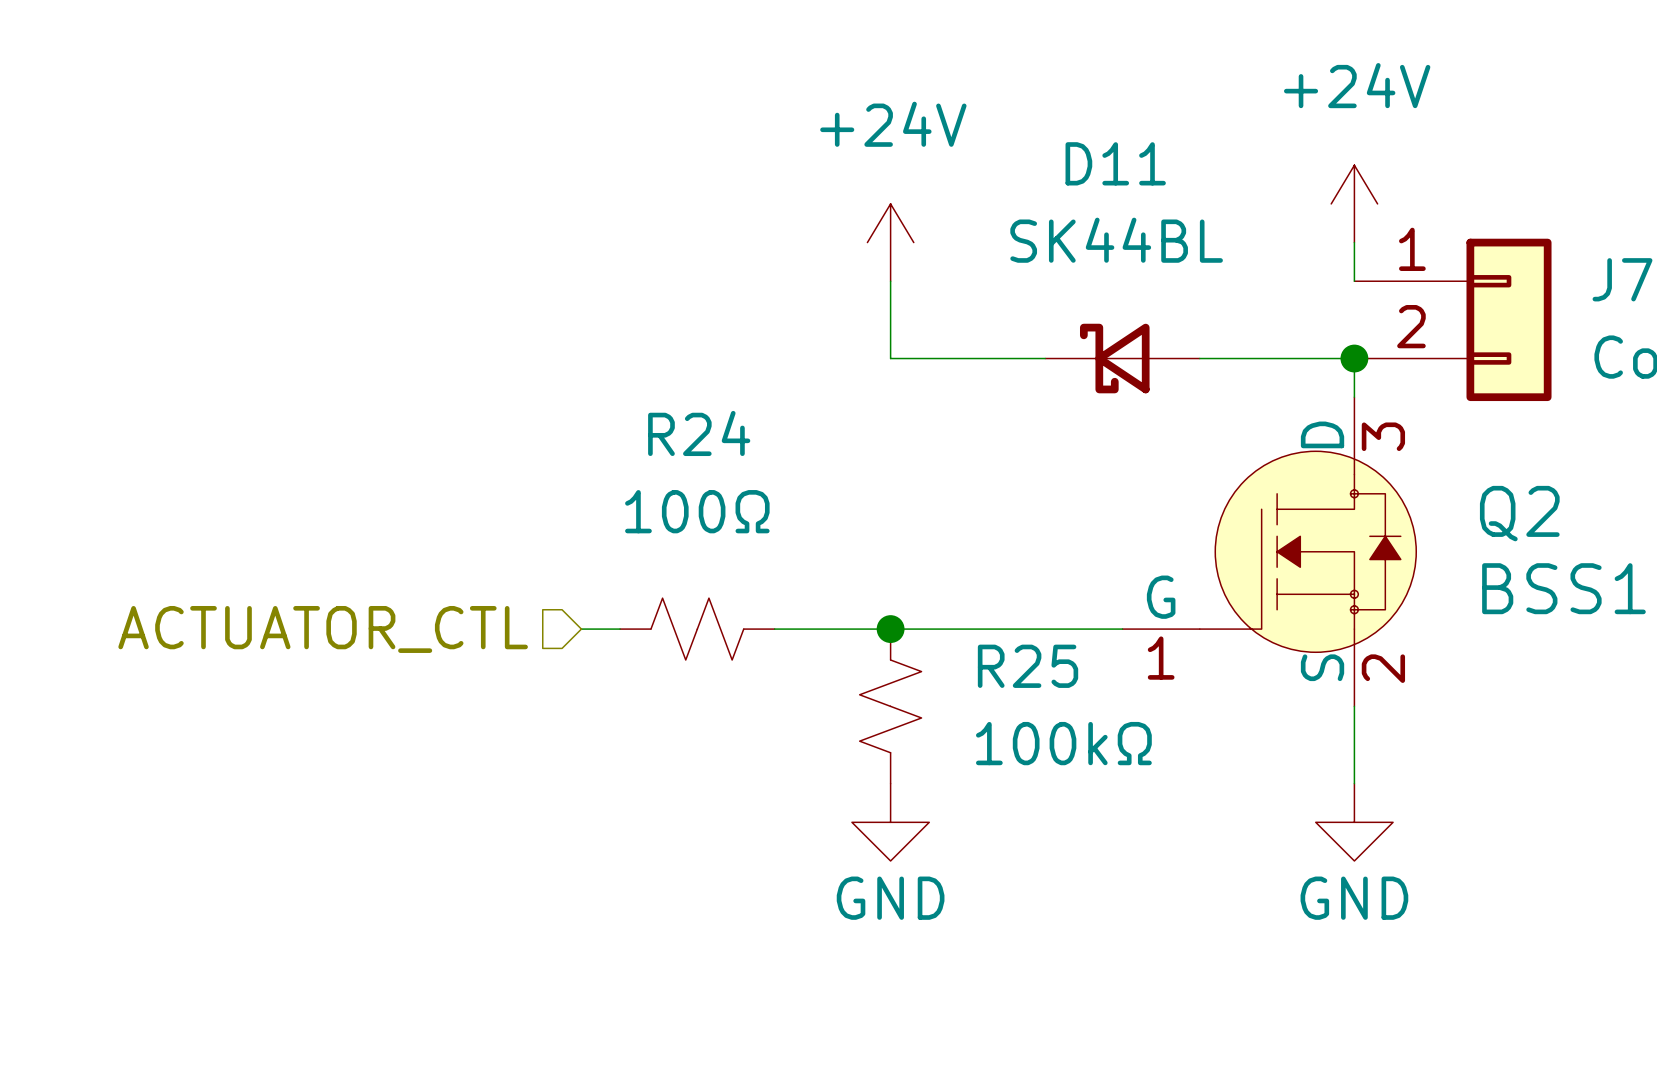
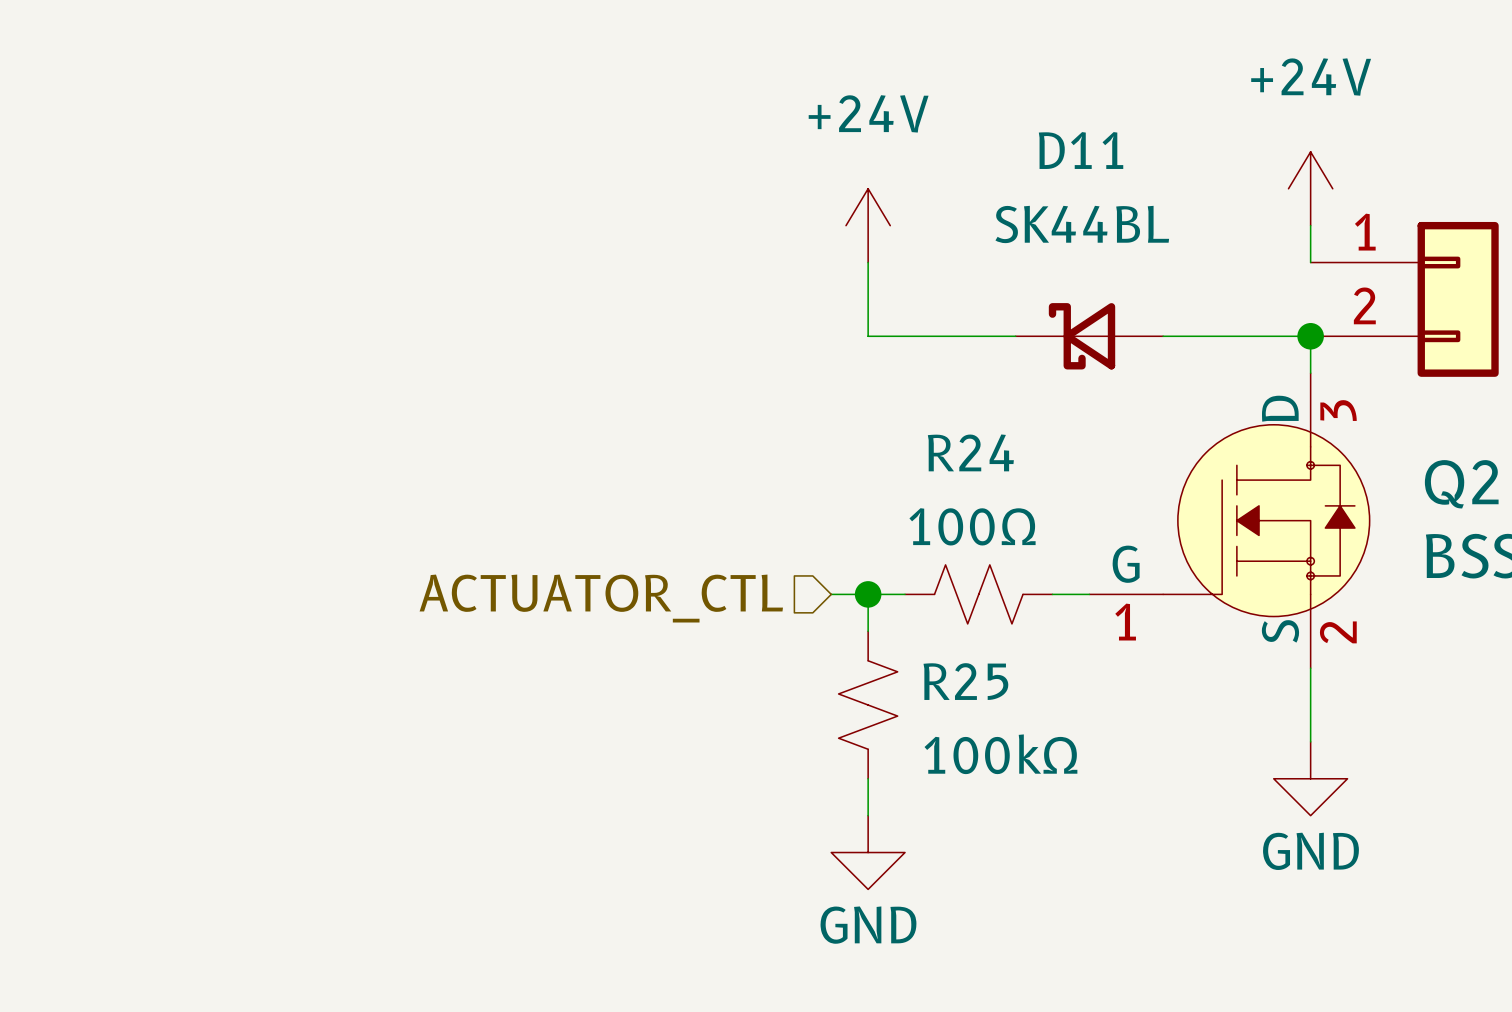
R24 name position: R24 (699, 433) -> R24 (970, 452)
R24 value position: 100Ω (697, 511) -> 100Ω (972, 526)
hierarchical label position: ACTUATOR_CTL (323, 629) -> ACTUATOR_CTL (601, 598)
wire: (581, 629) (620, 629) -> none
R24 position: (697, 629) -> (978, 594)
wire: (774, 629) (851, 629) -> none
wire: (929, 629) (1083, 629) -> none
R25 name position: R25 (1028, 666) -> R25 (965, 681)
R25 position: (890, 706) -> (868, 705)
R25 value position: 100kΩ (1063, 743) -> 100kΩ (1000, 754)
wire: none -> (868, 778) (868, 815)
power symbol position: GND (890, 822) -> GND (868, 852)

